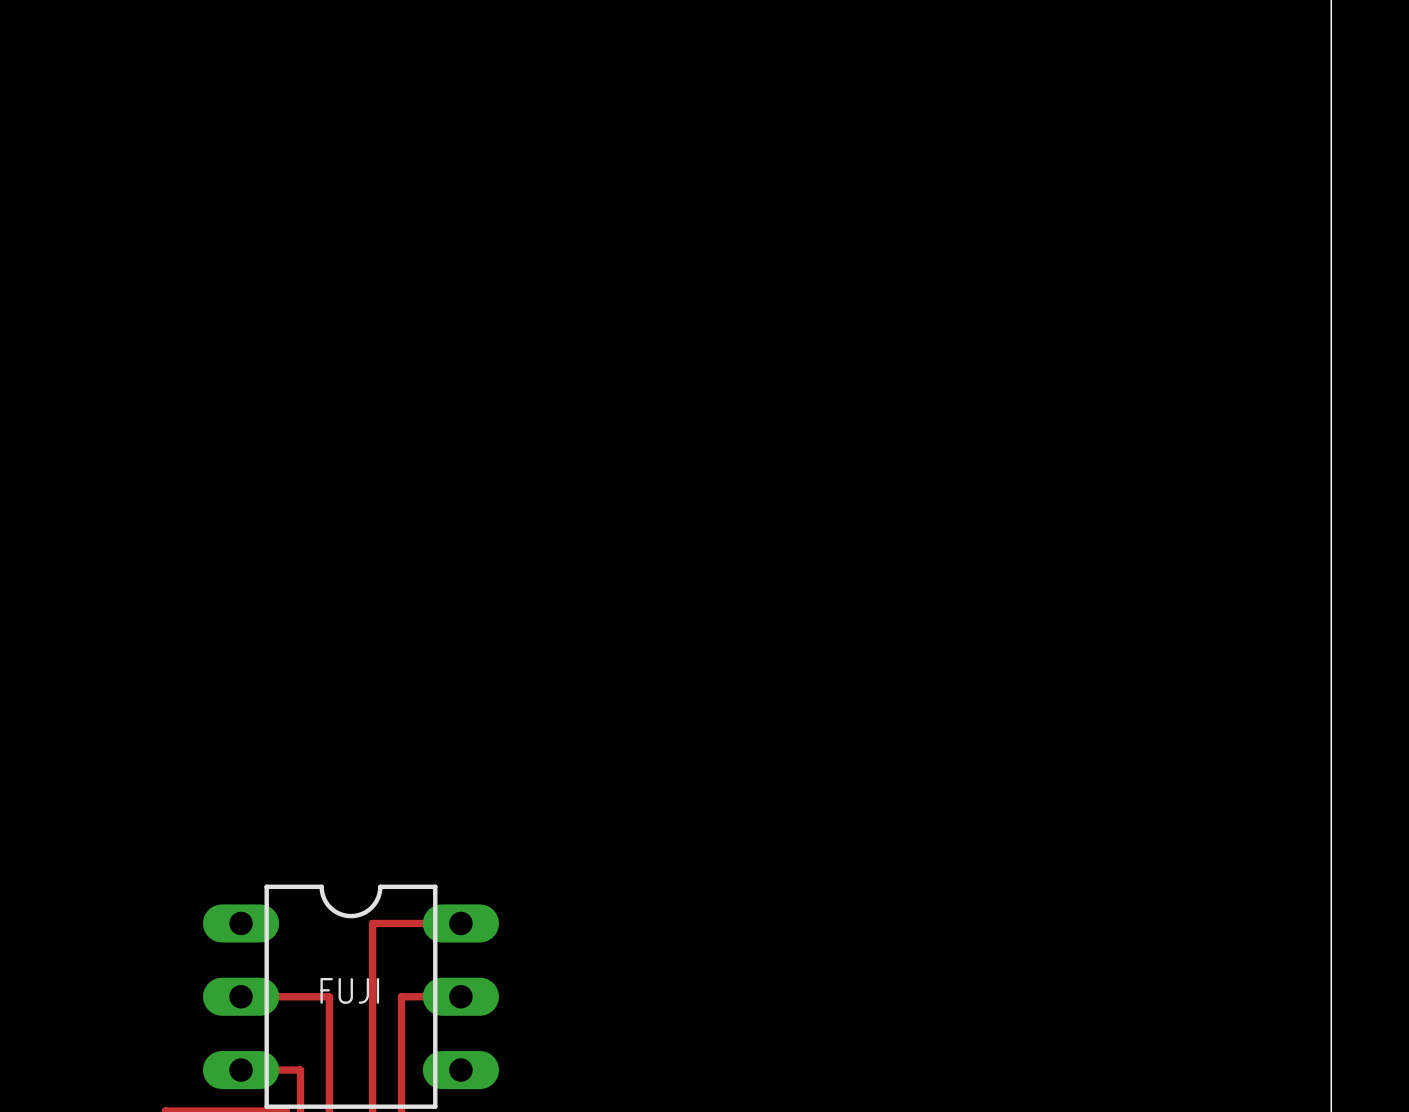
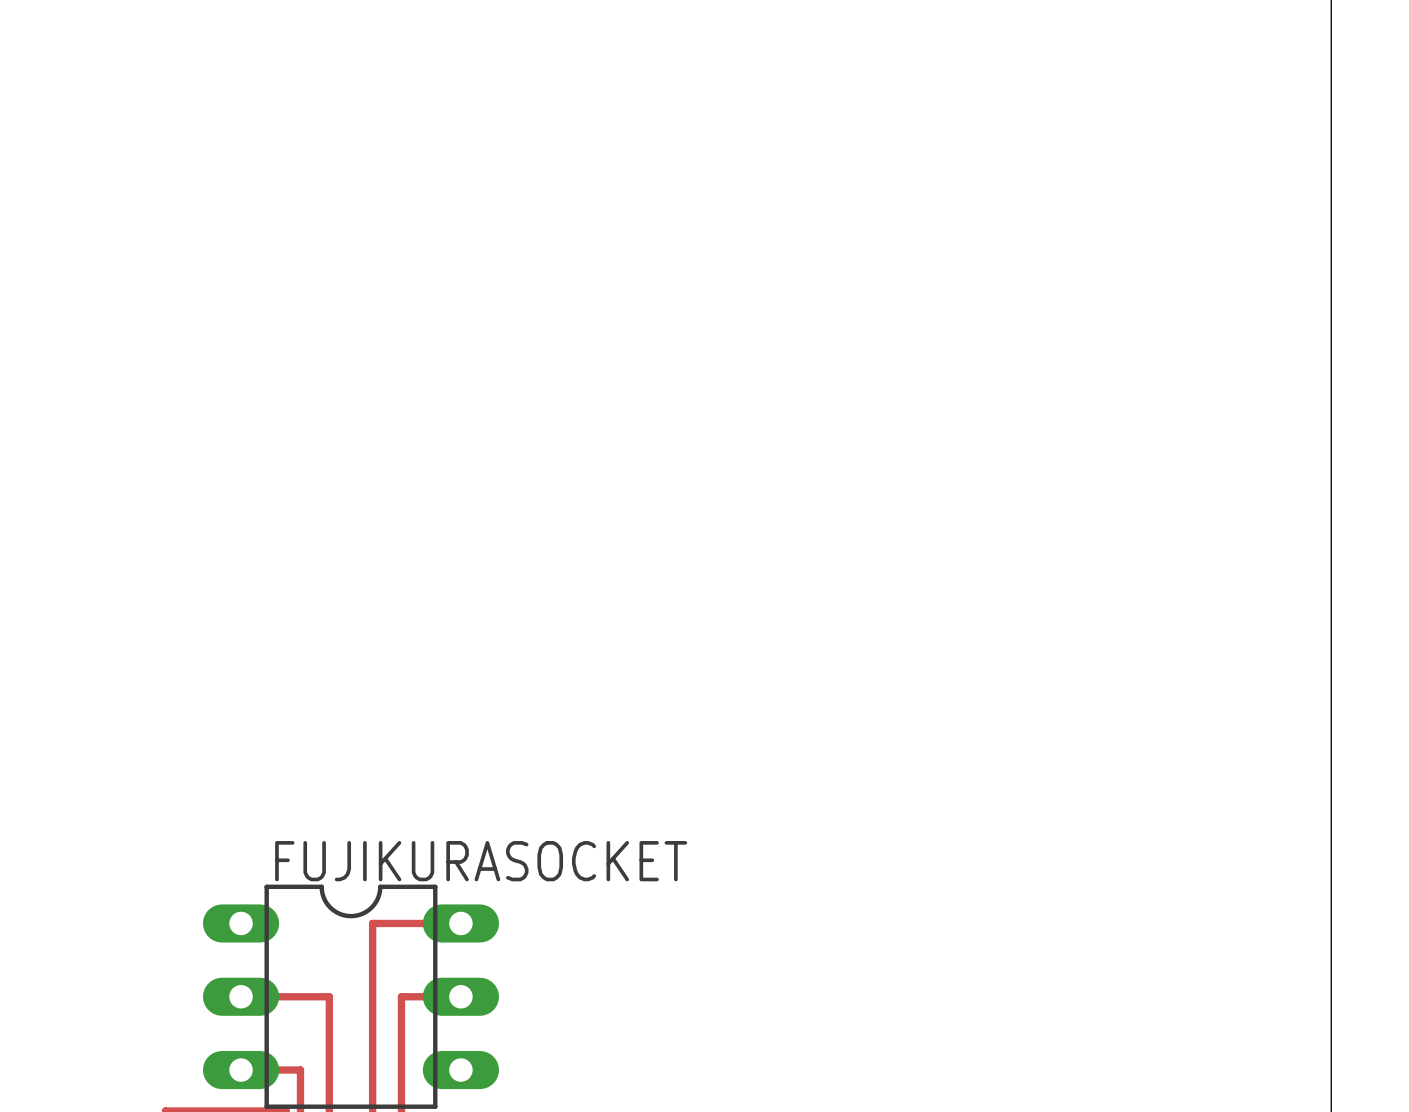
FUJI name: FUJI (349, 990) -> FUJIKURASOCKET (481, 861)

